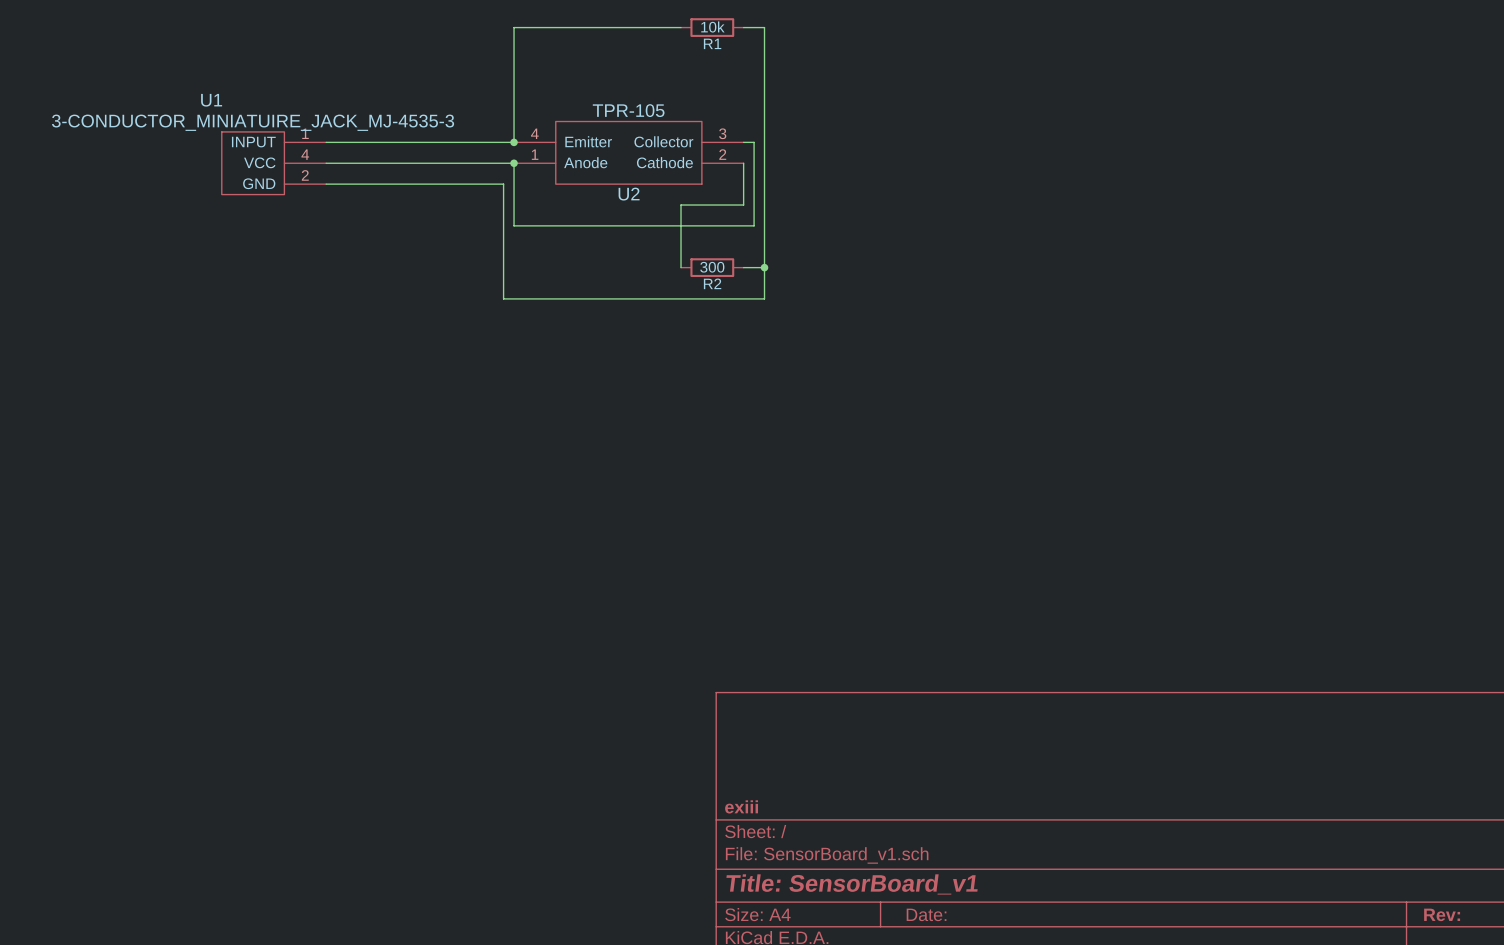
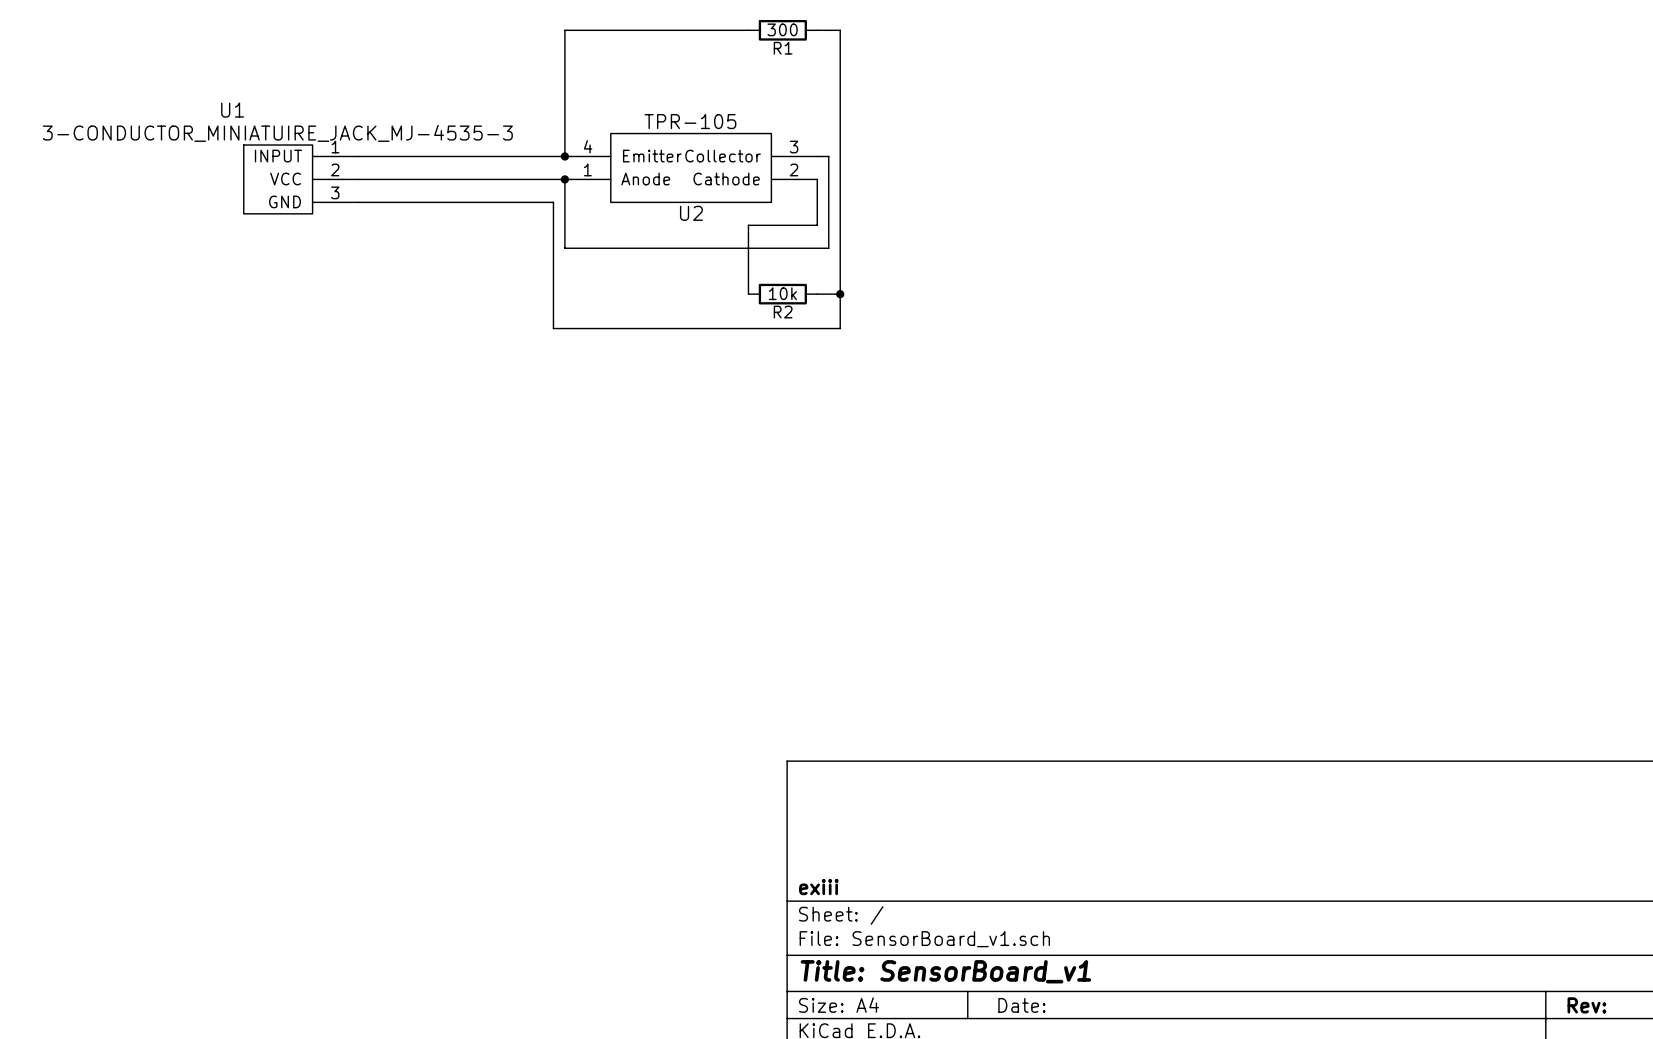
R1 value: 10k (712, 26) -> 300 (782, 29)
U1 pin number: 4 (305, 154) -> 2 (335, 169)
U1 pin number: 2 (305, 175) -> 3 (335, 192)
R2 value: 300 (712, 267) -> 10k (782, 293)

